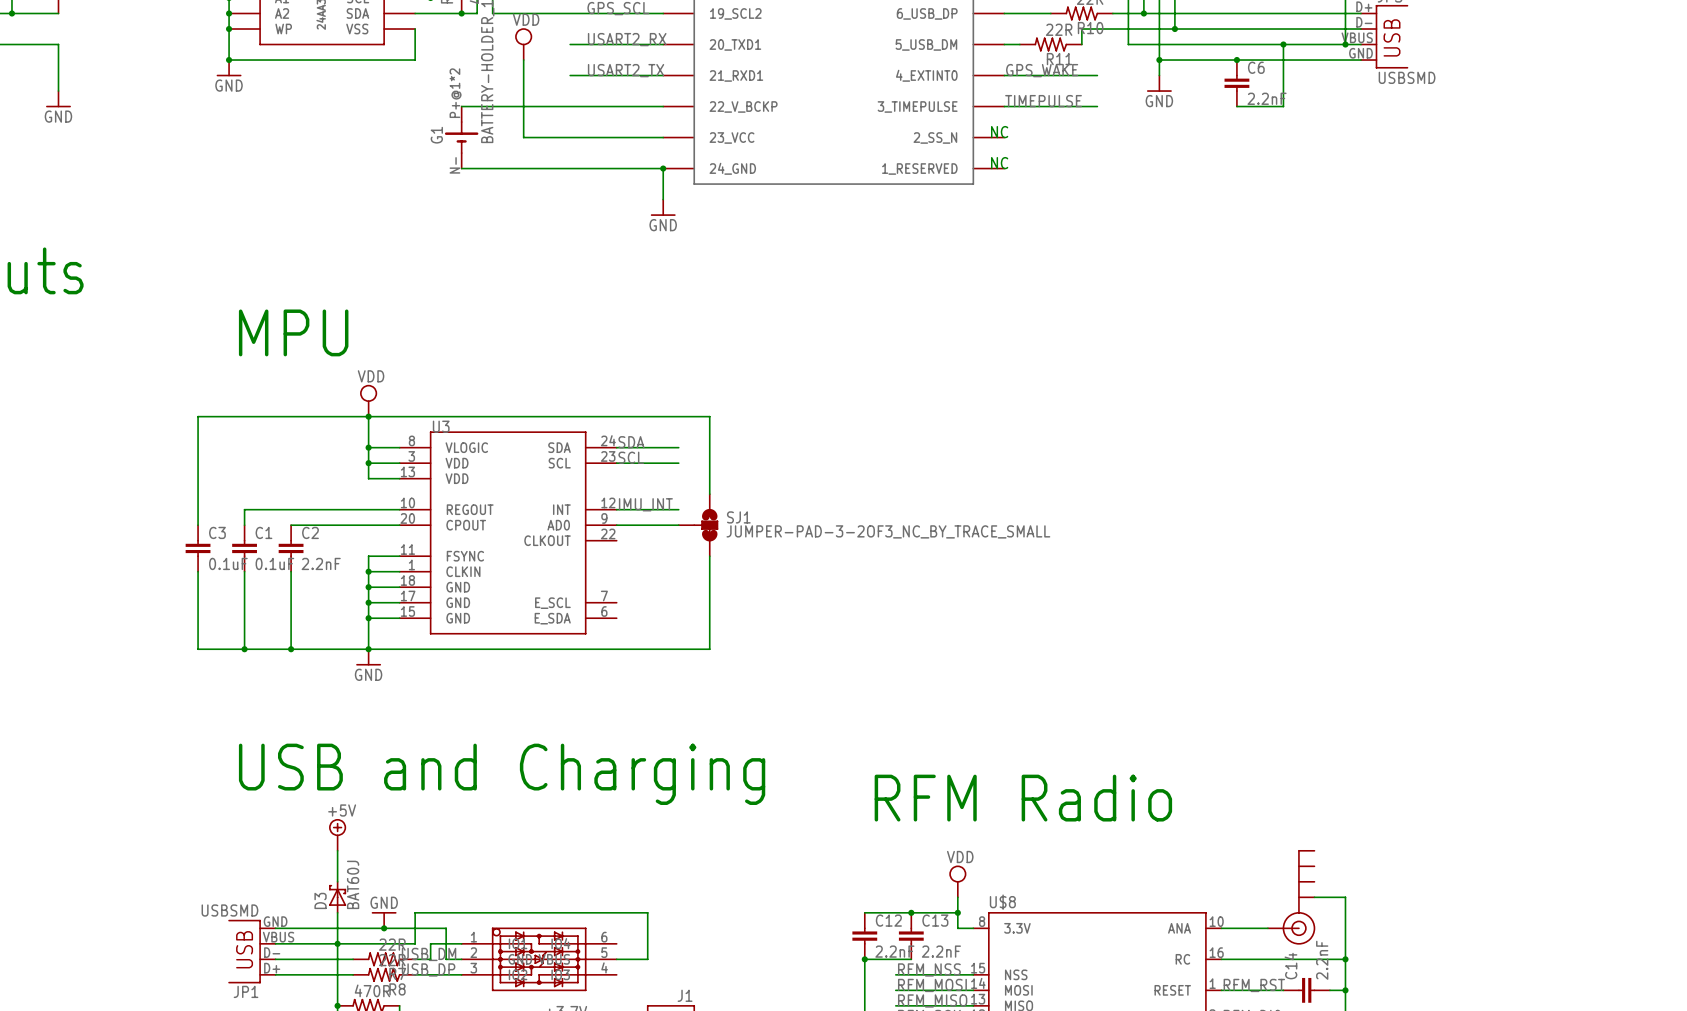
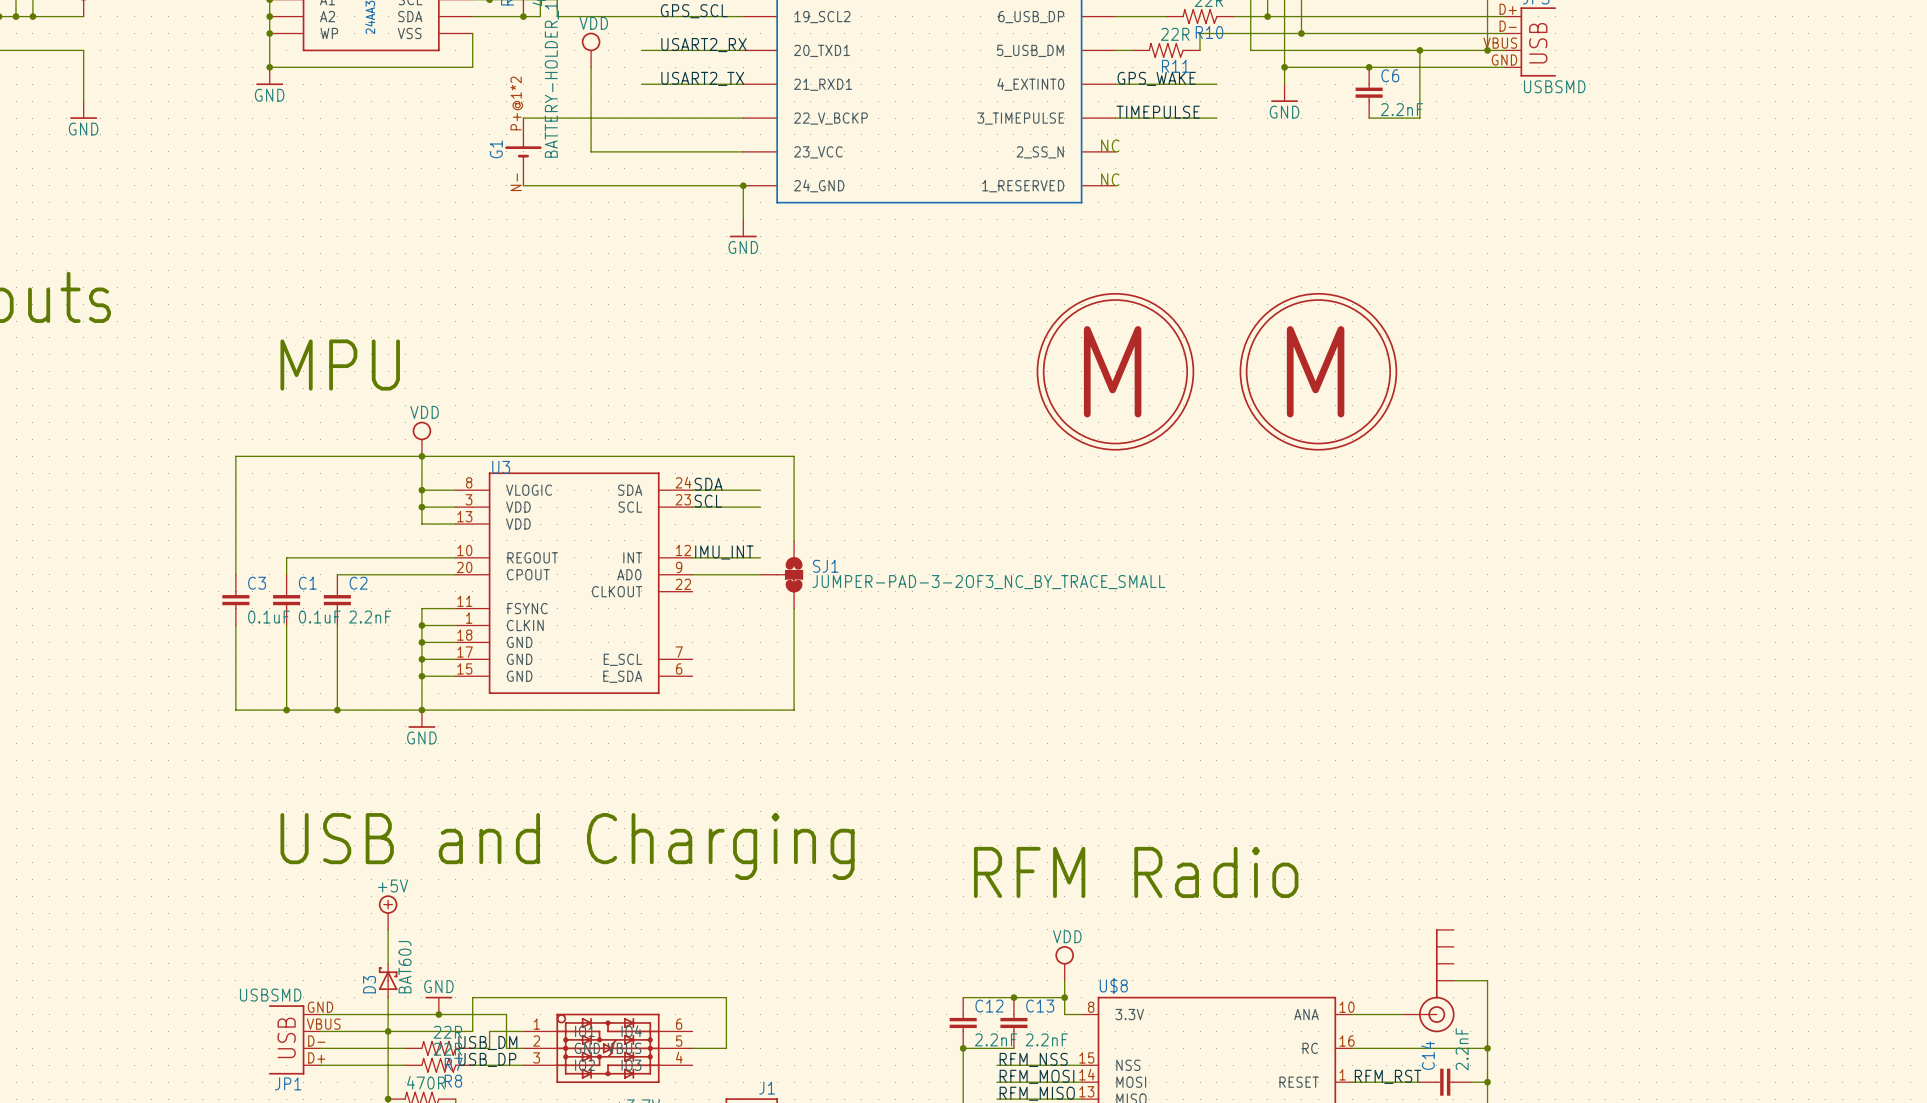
part: none -> (1115, 371)
part: none -> (1318, 371)

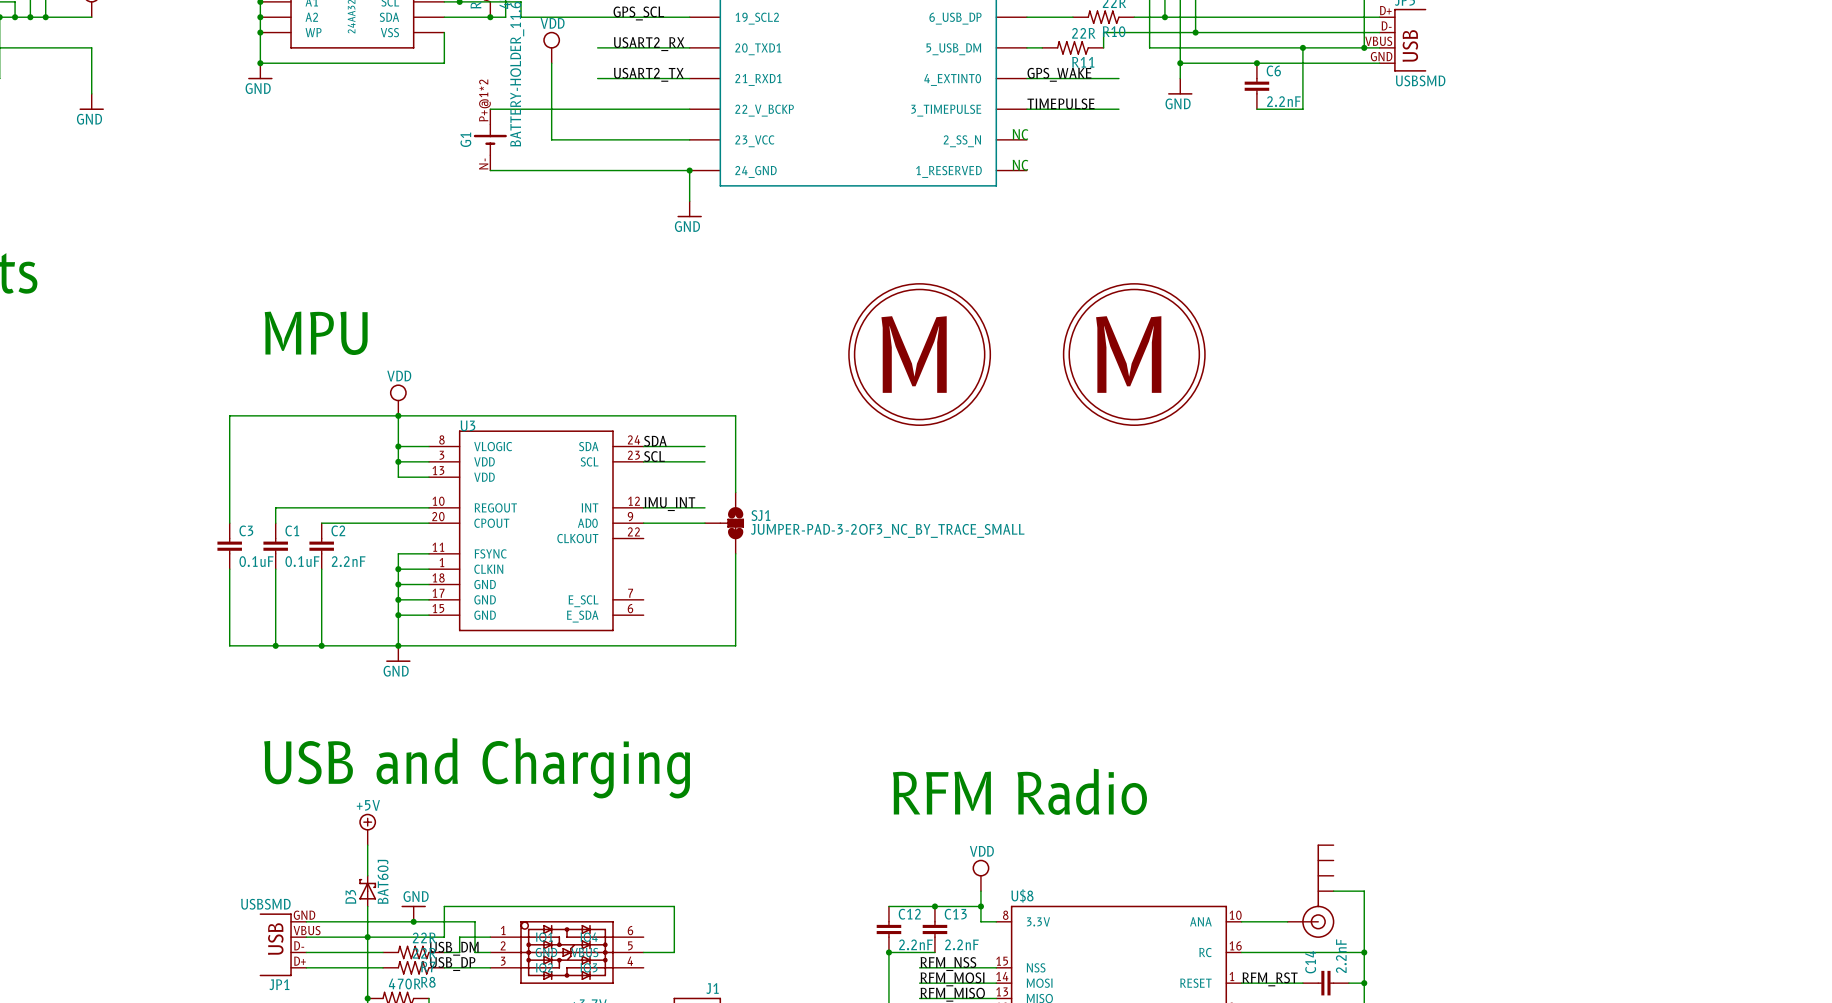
part: (1115, 371) -> none
part: (1318, 371) -> none
part: none -> (919, 354)
part: none -> (1134, 354)

